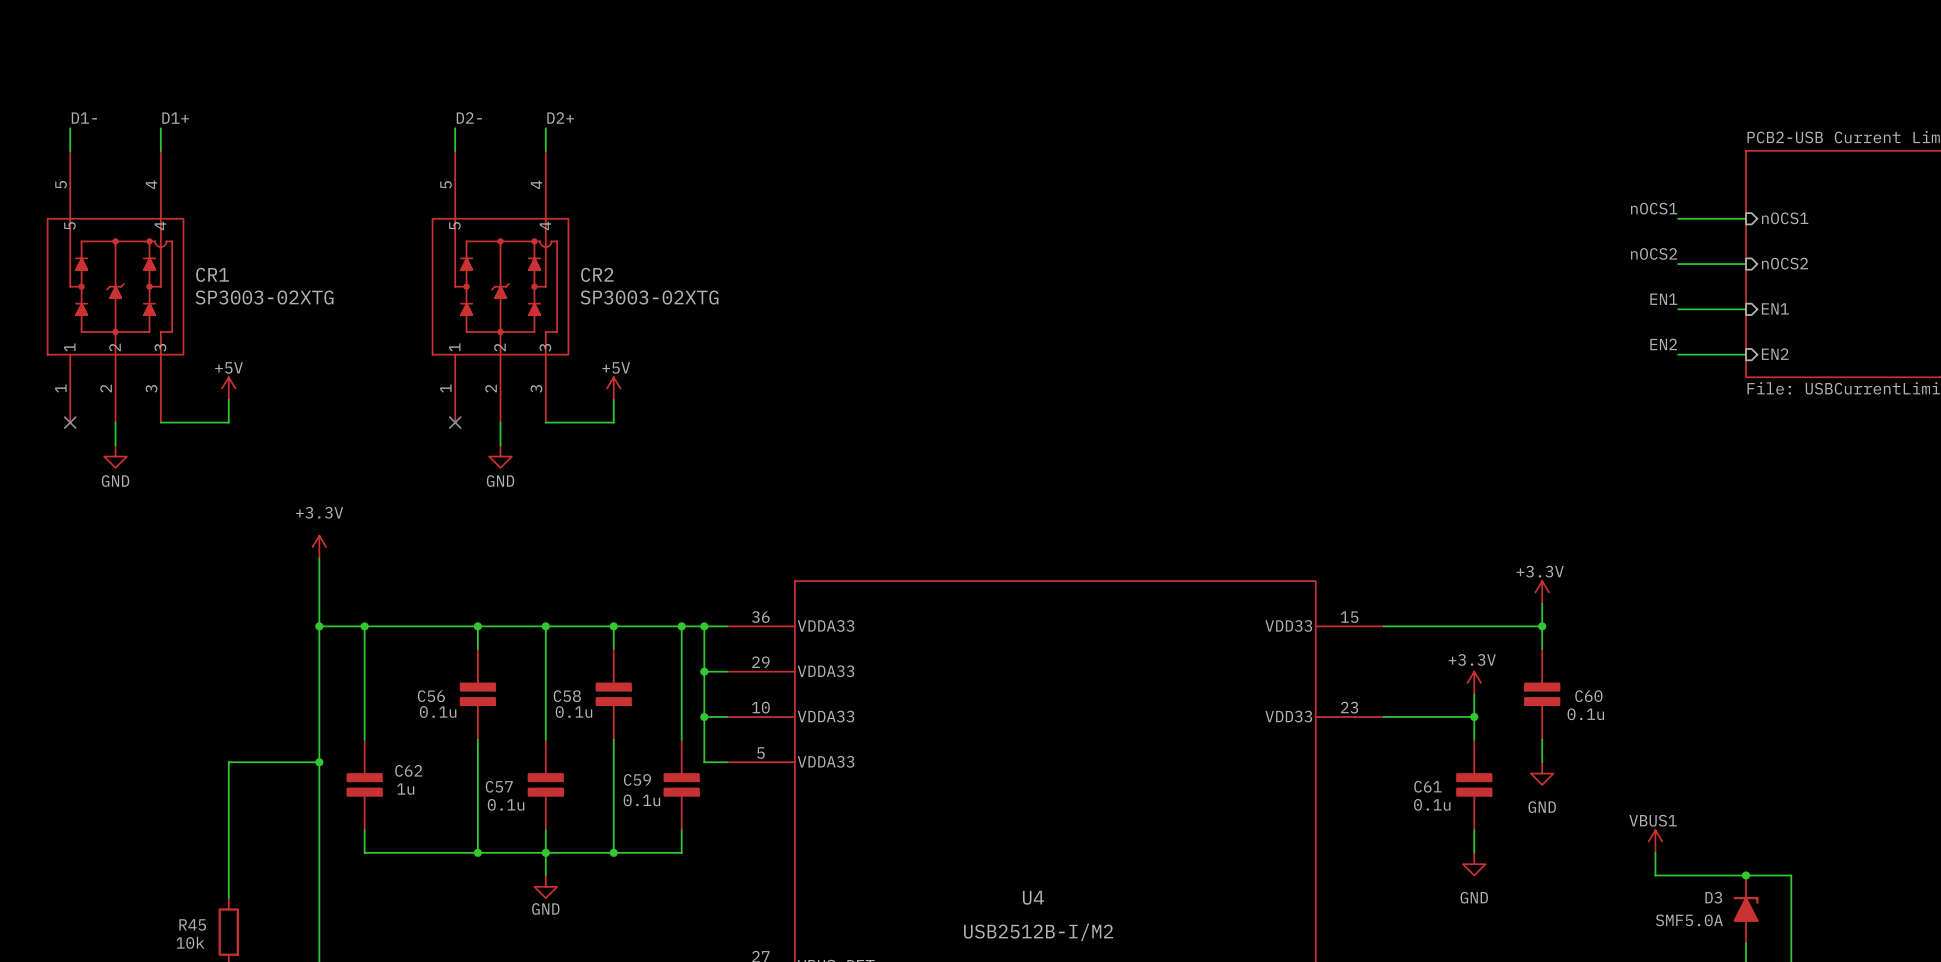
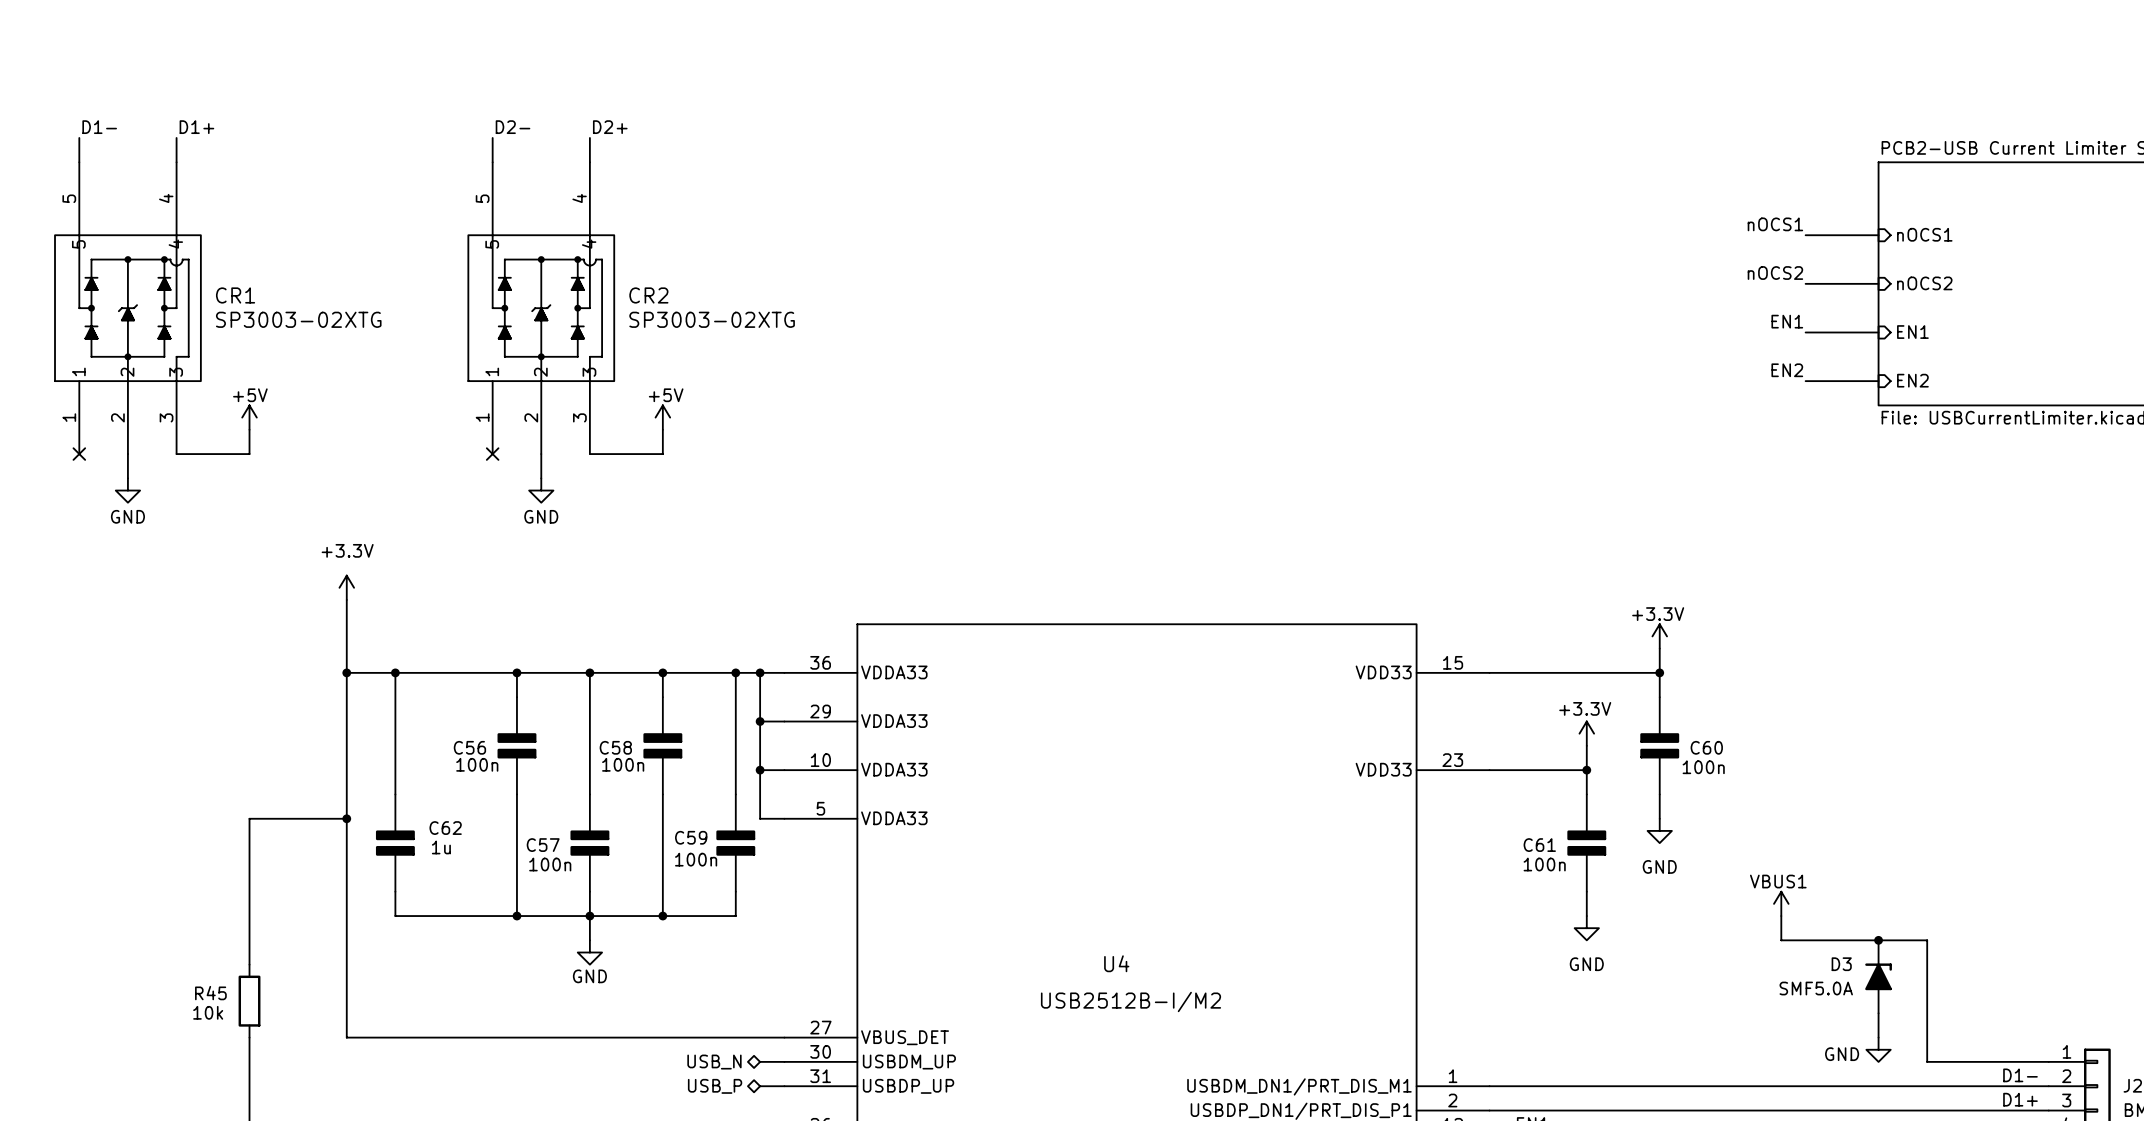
C56 value: 0.1u (438, 712) -> 100n (477, 764)
C58 value: 0.1u (573, 712) -> 100n (623, 764)
C60 value: 0.1u (1585, 714) -> 100n (1703, 767)
C59 value: 0.1u (641, 800) -> 100n (696, 859)
C57 value: 0.1u (506, 804) -> 100n (550, 864)
C61 value: 0.1u (1432, 804) -> 100n (1544, 864)

